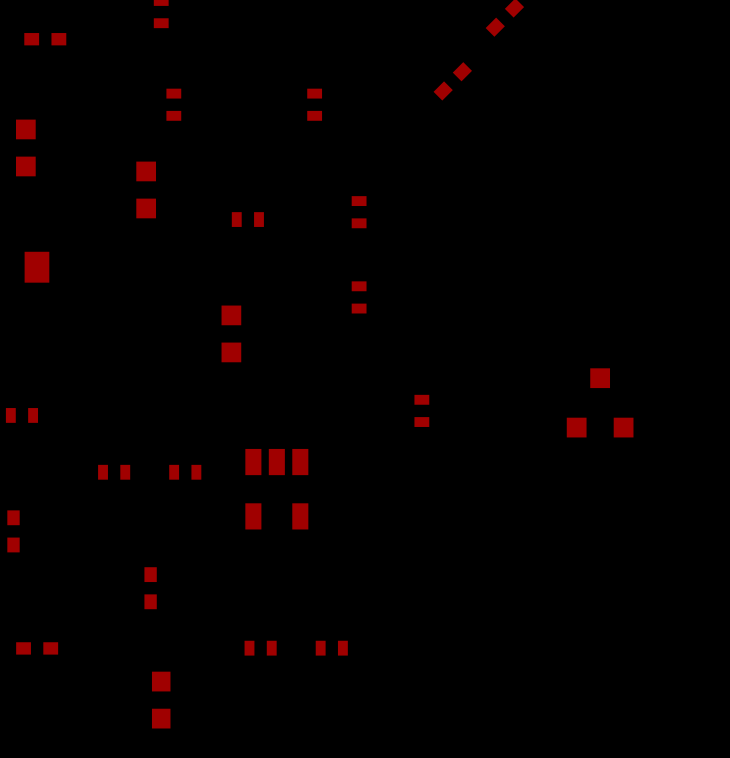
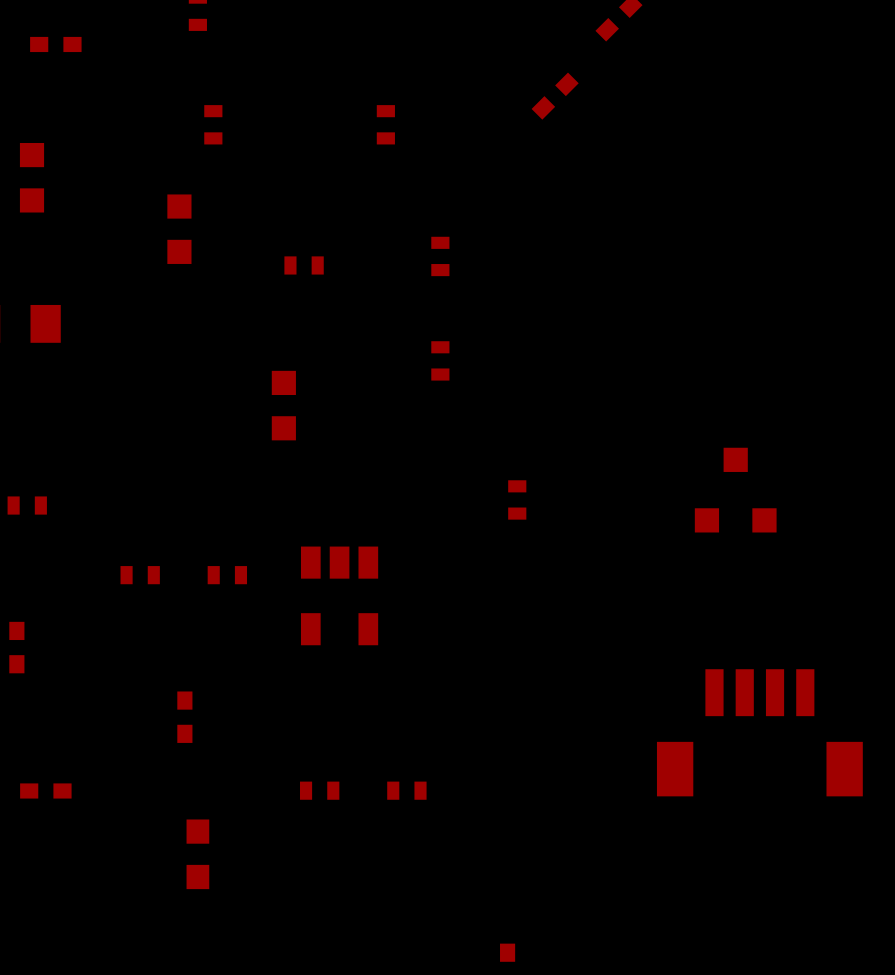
part: none -> (759, 732)

